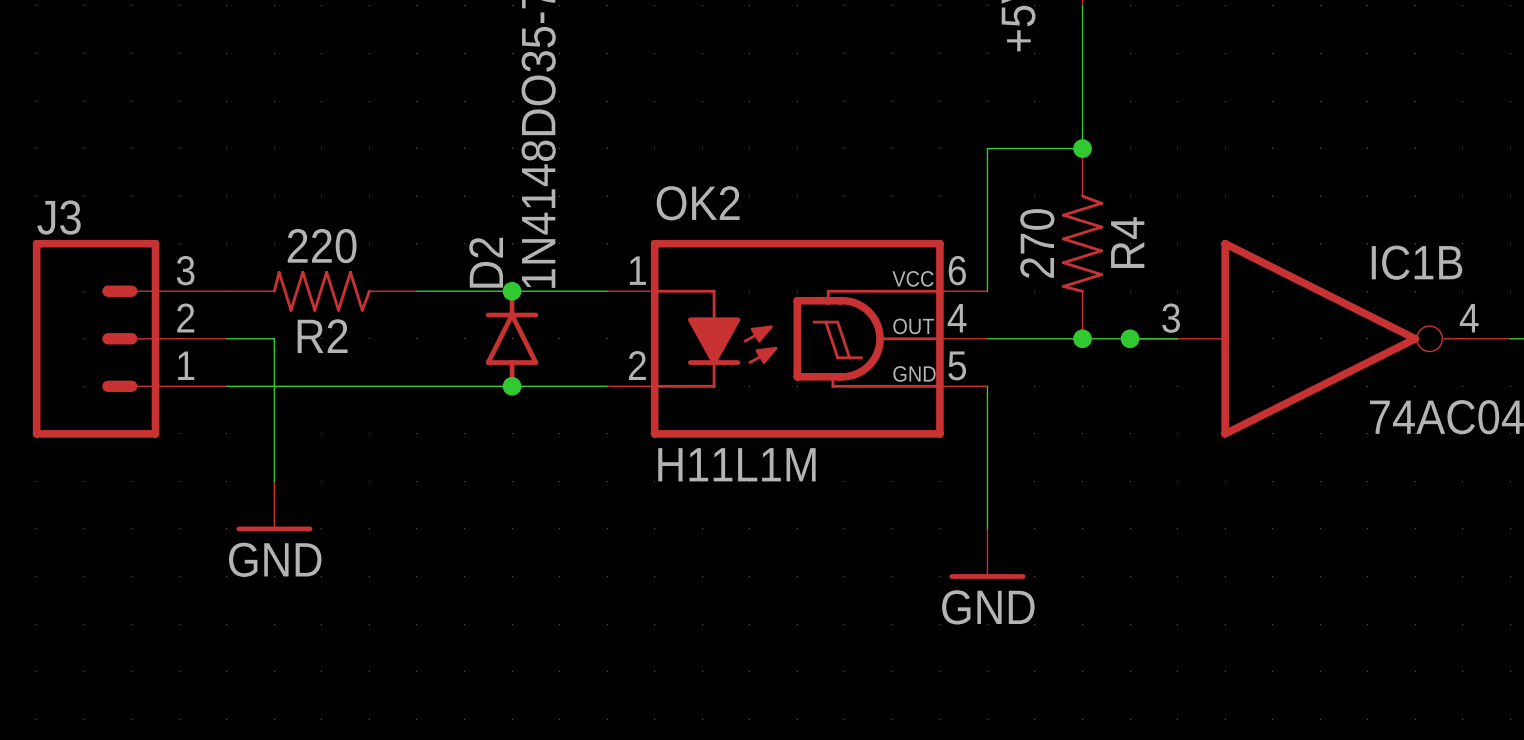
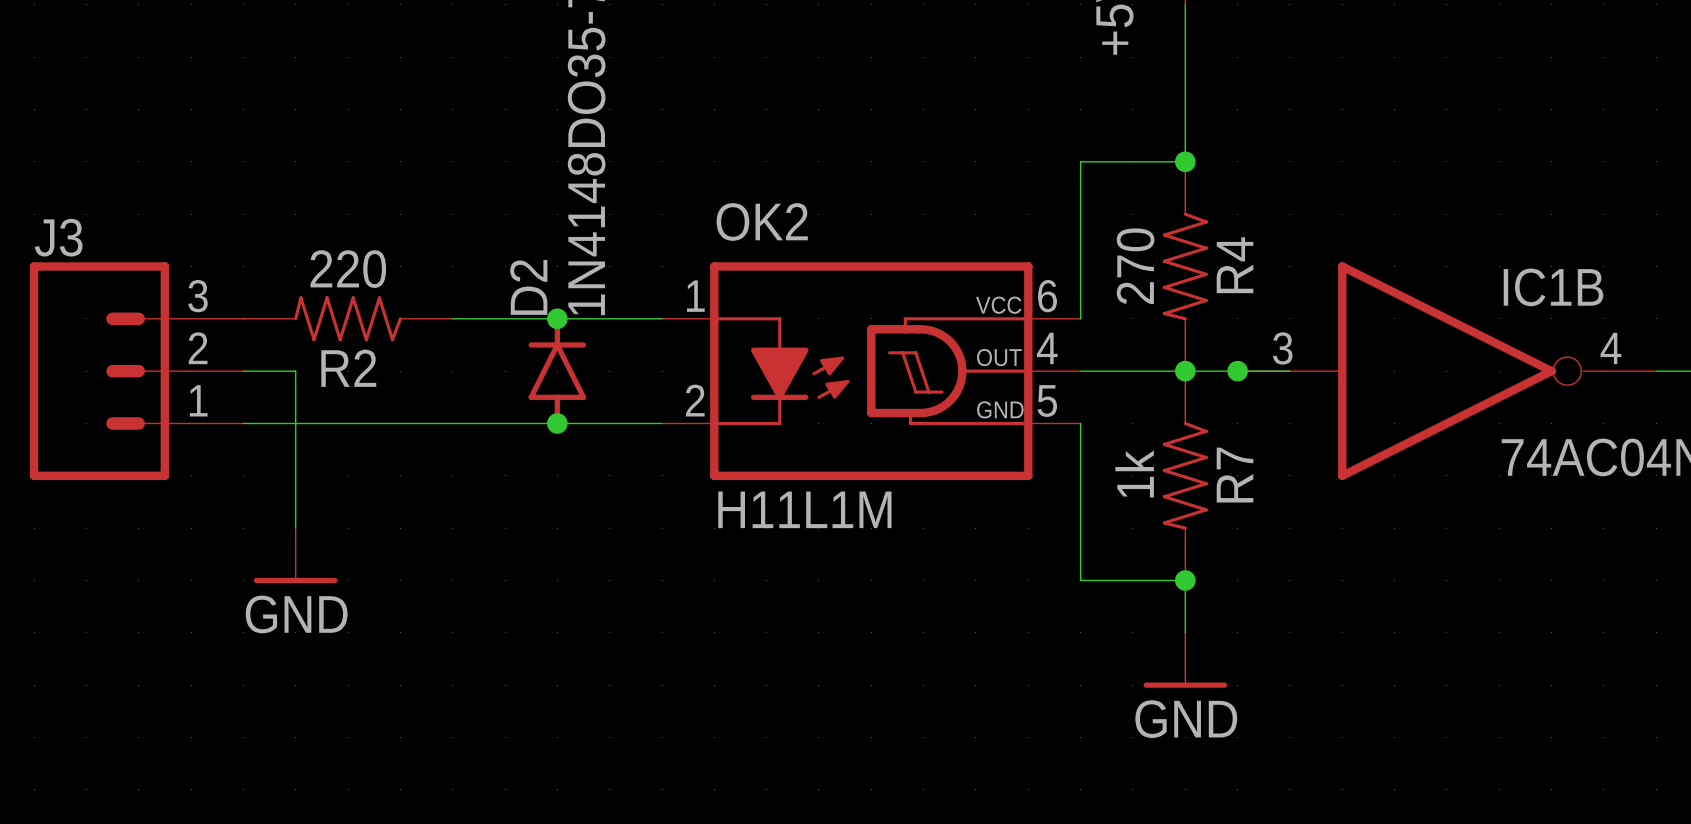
R7: none -> 1k (1185, 475)
wire: none -> (1080, 580) (1185, 580) (1185, 632)
junction: none -> (1185, 580)
power symbol position: GND (987, 553) -> GND (1185, 660)

